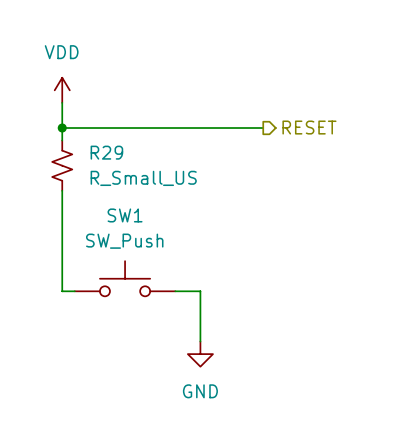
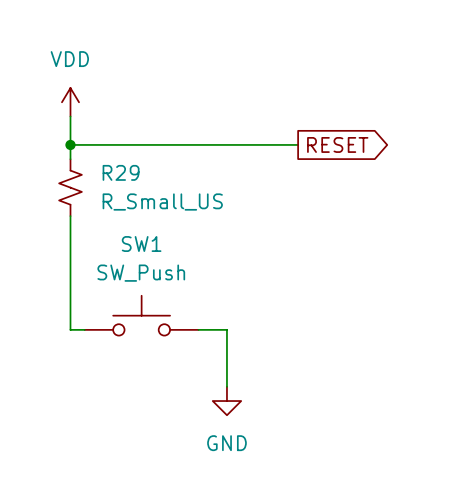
hierarchical label: RESET (309, 127) -> none
global label: none -> RESET (337, 144)

